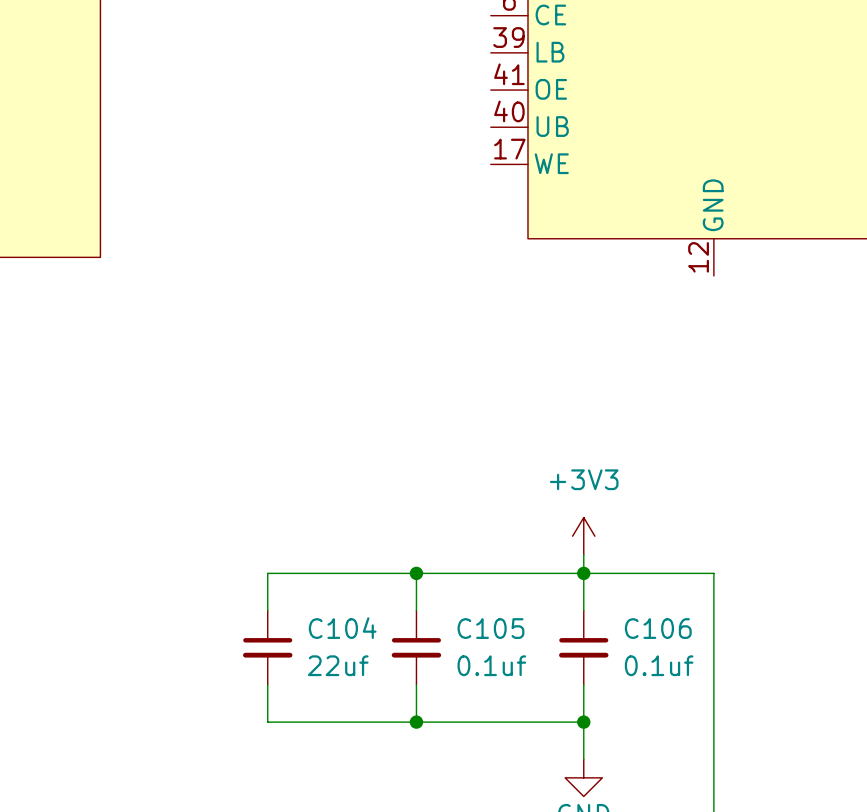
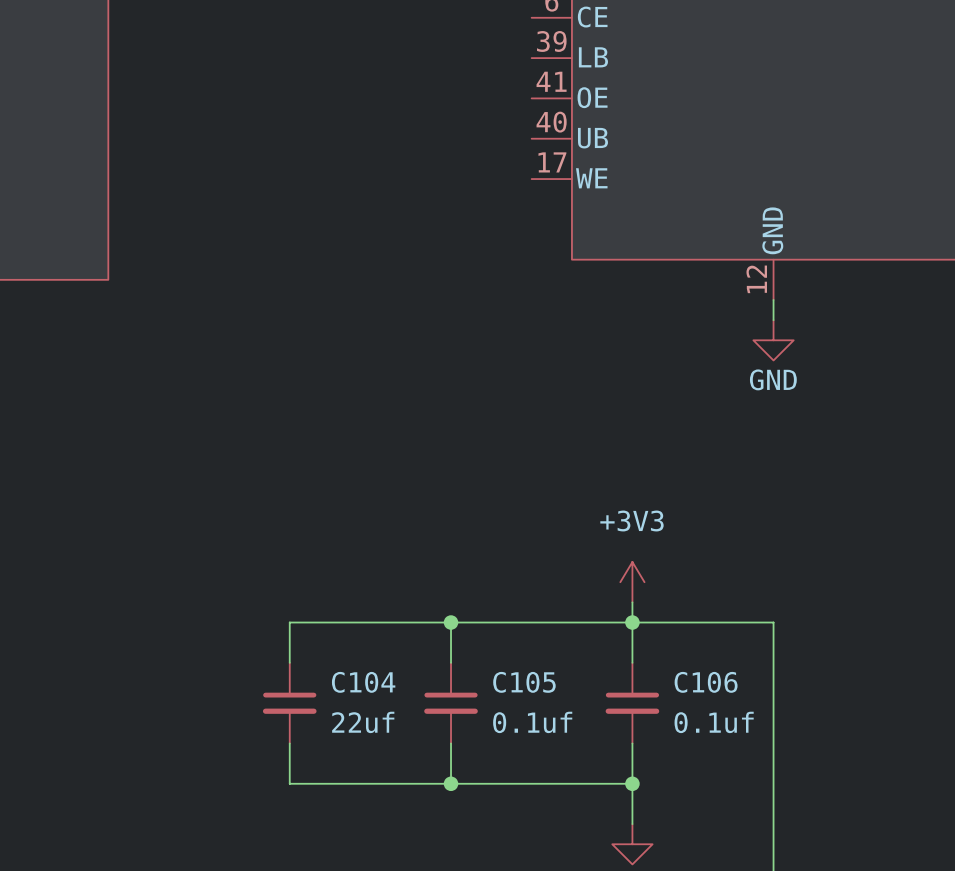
wire: none -> (773, 299) (773, 320)
power symbol: none -> GND (773, 340)

